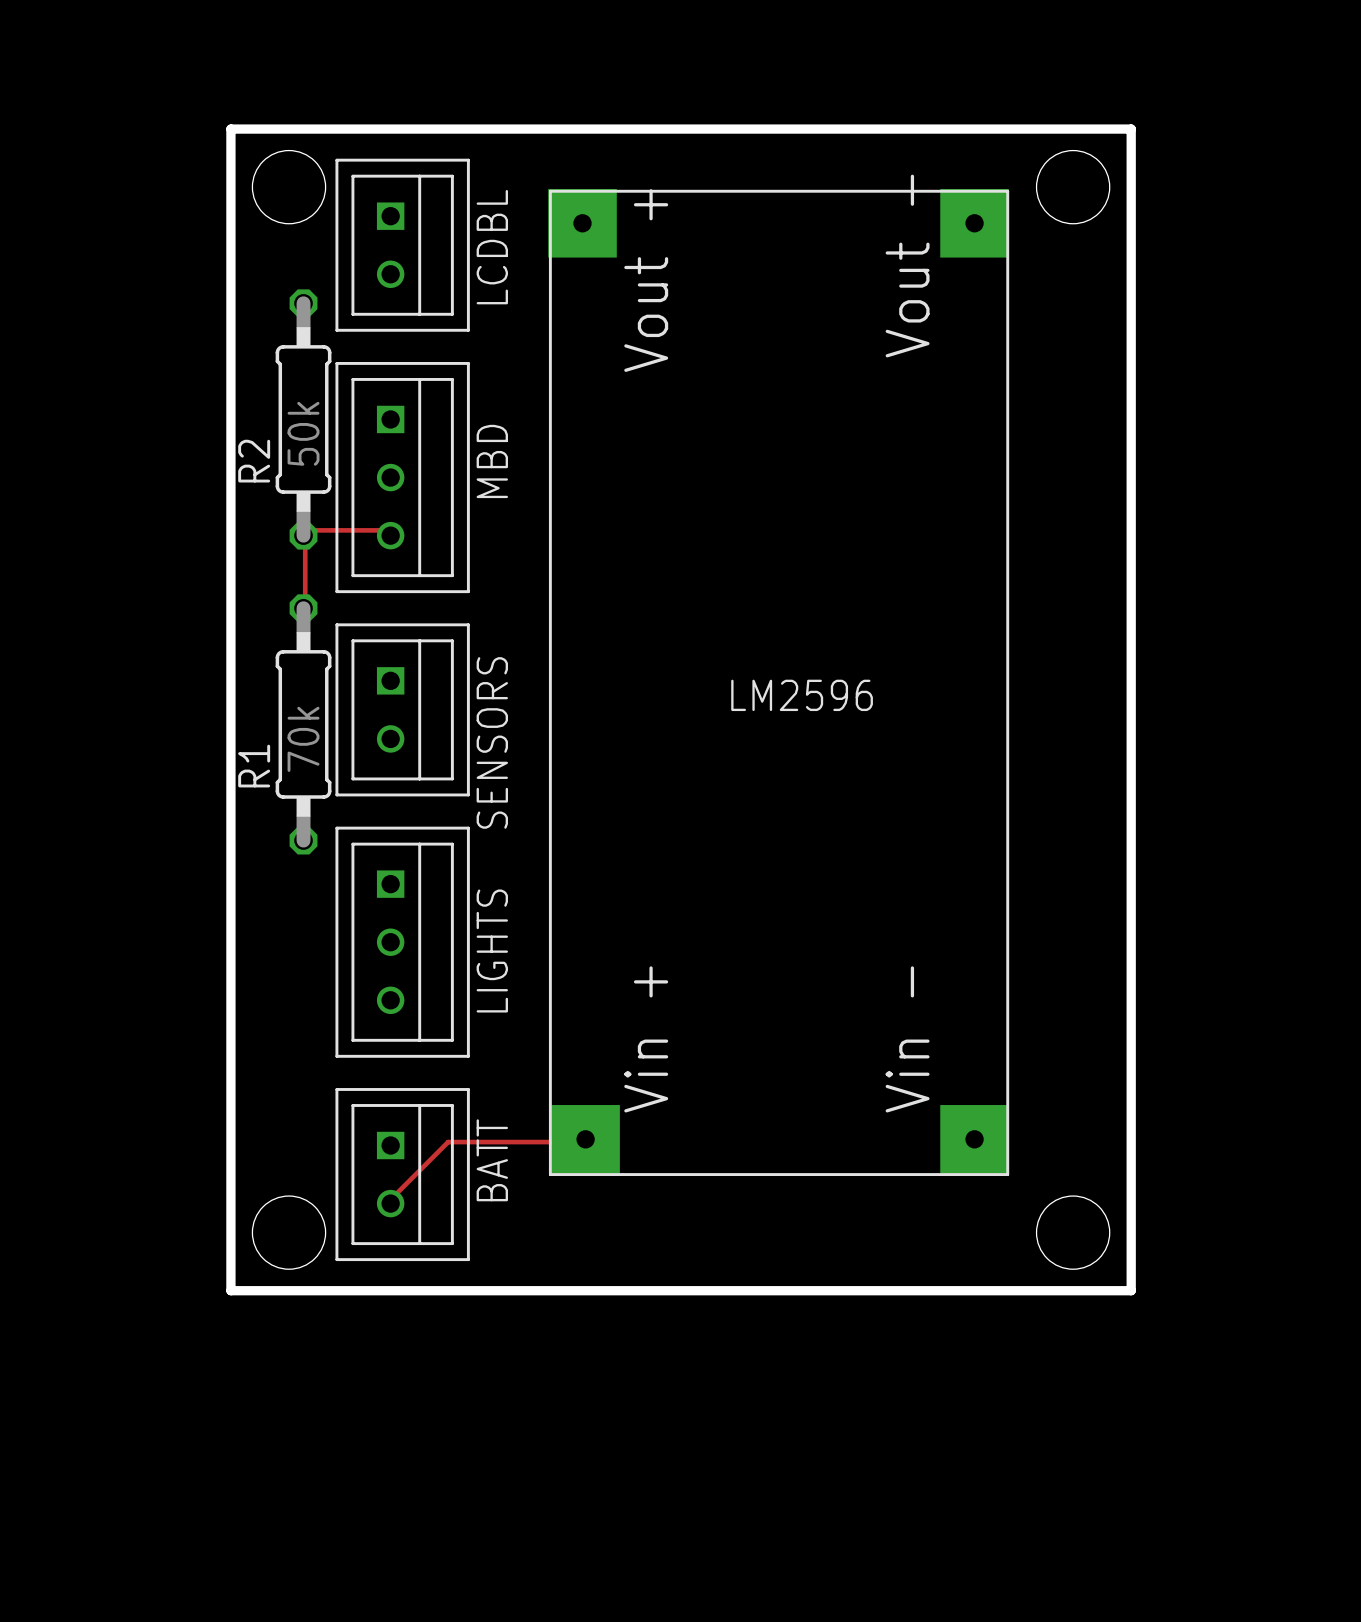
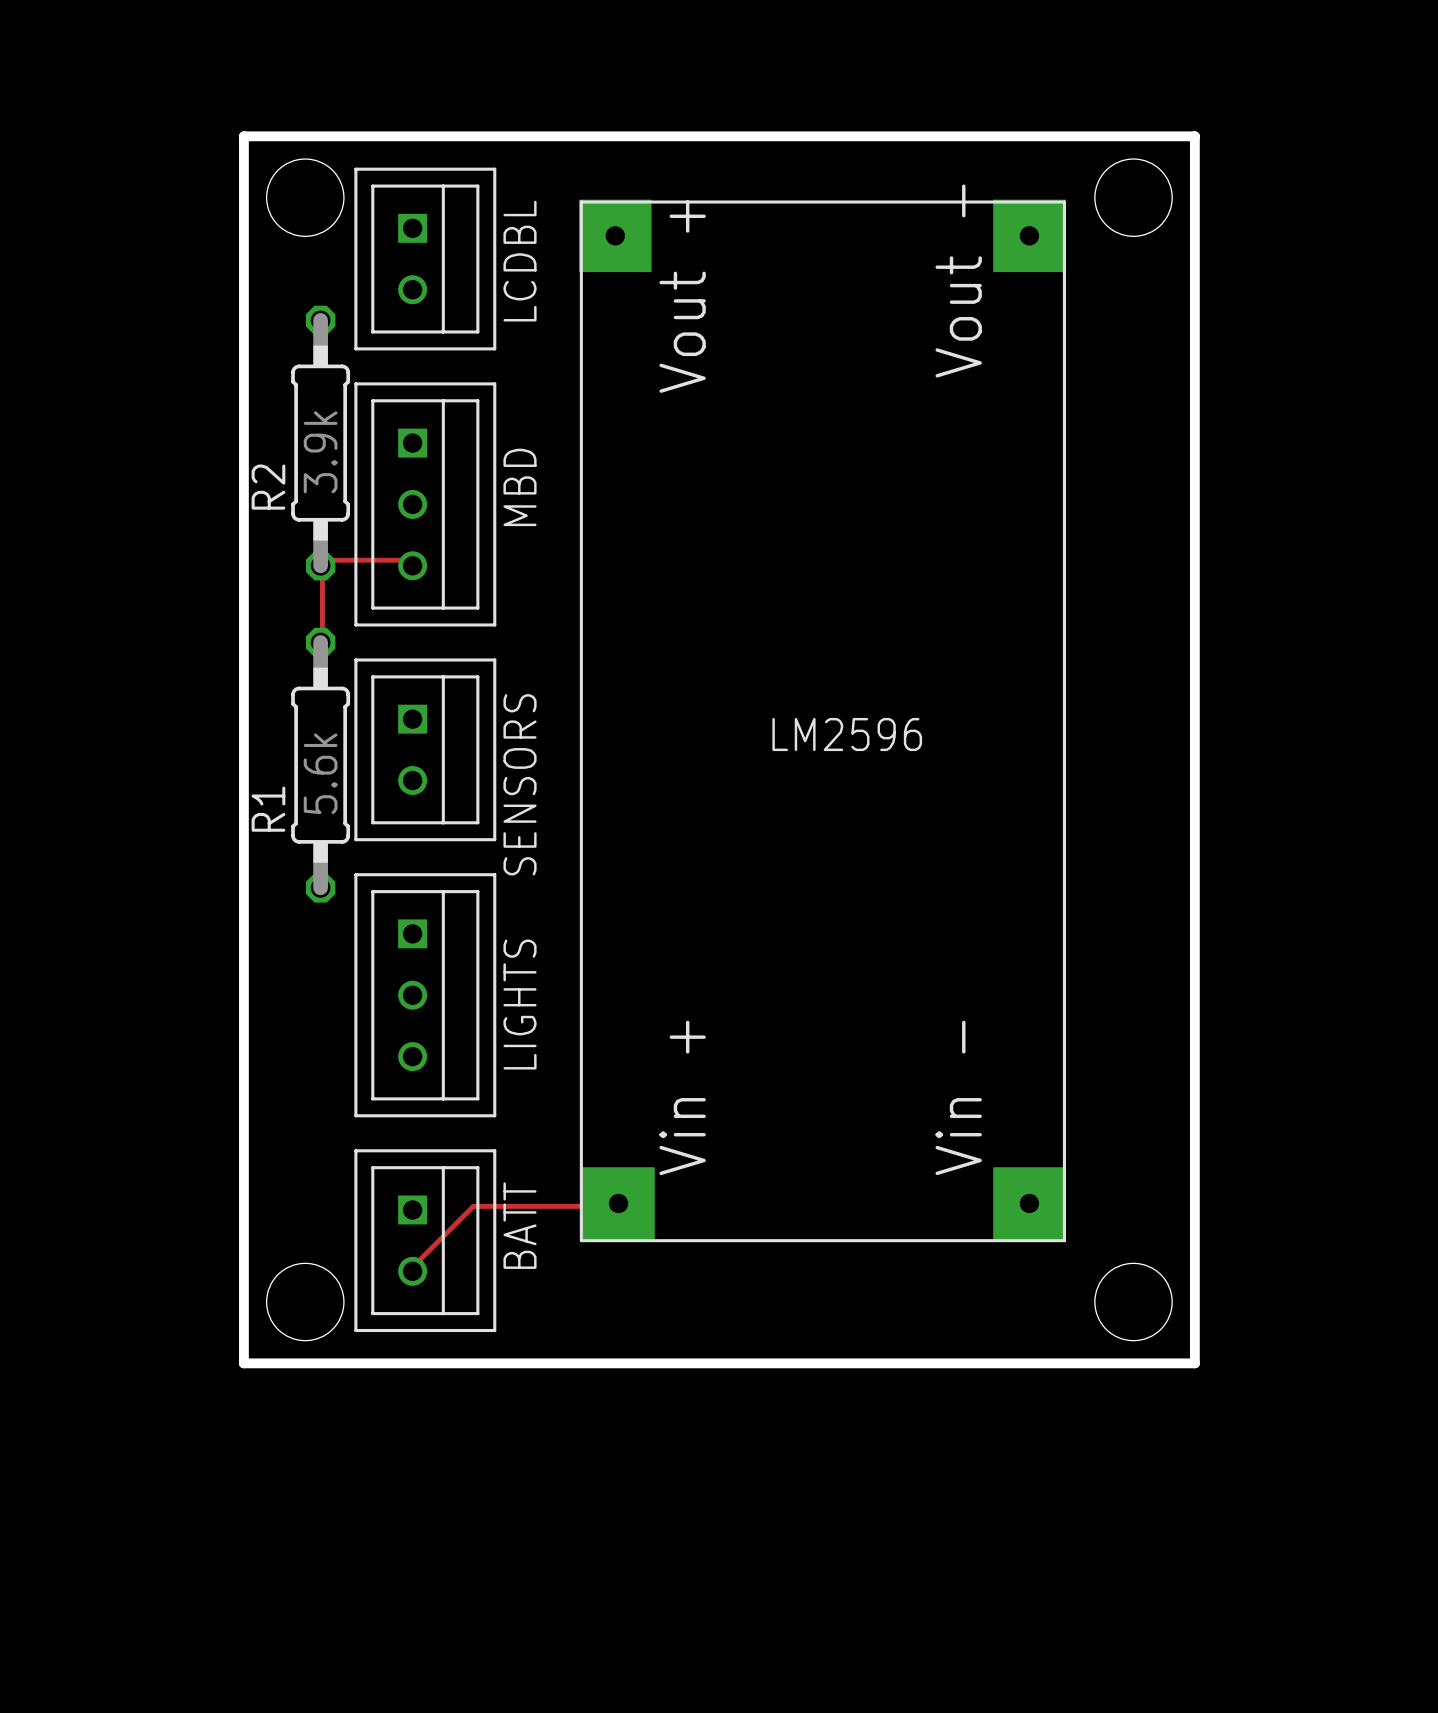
R2 value: 50k (303, 433) -> 3.9k (320, 452)
R1 value: 70k (303, 739) -> 5.6k (320, 773)

